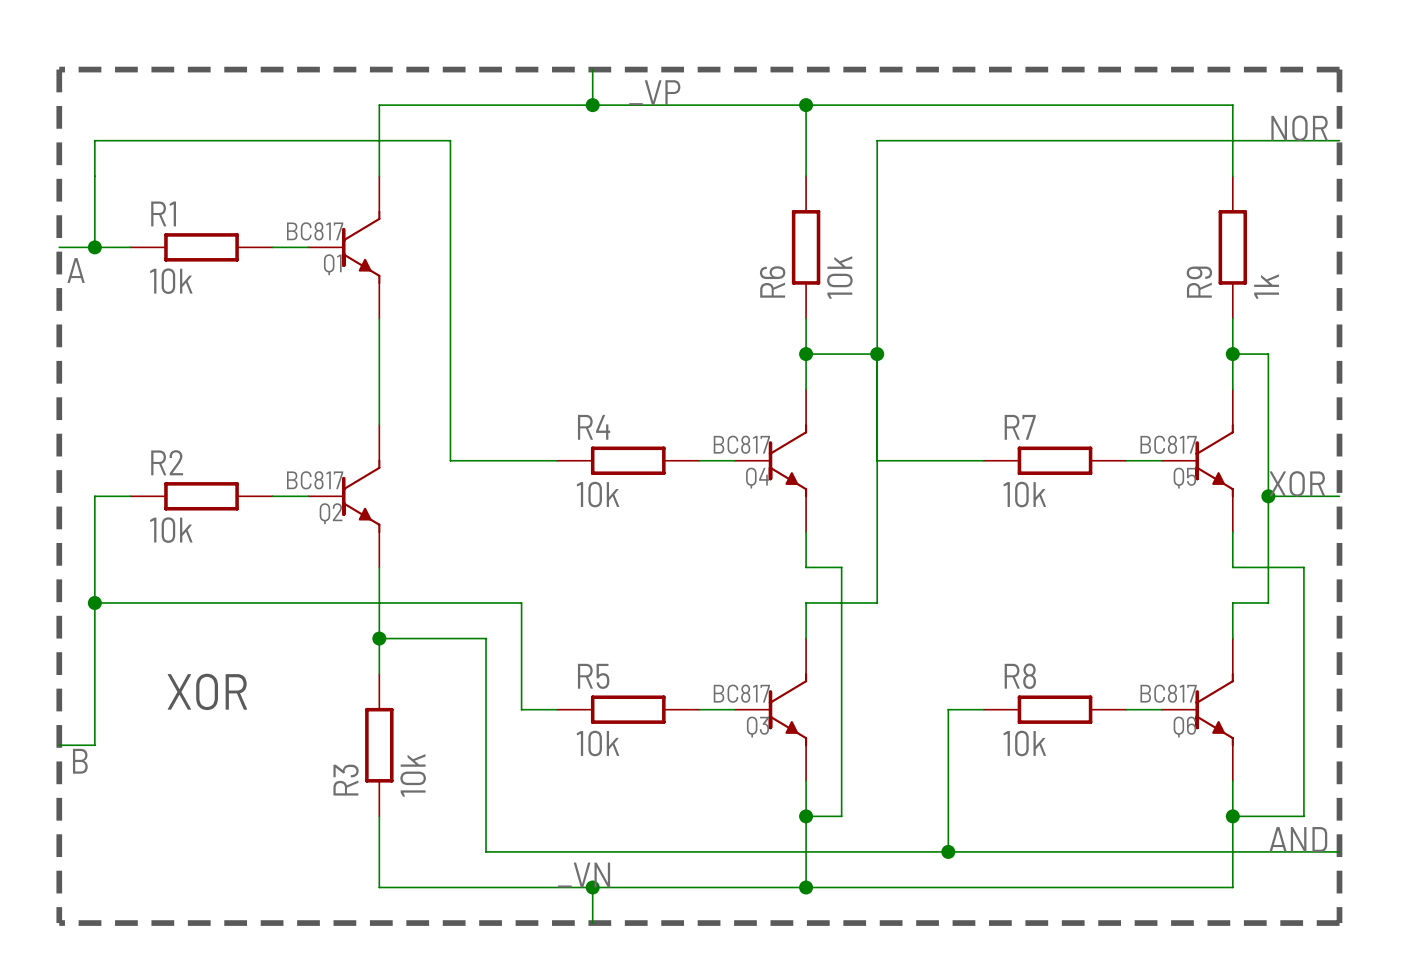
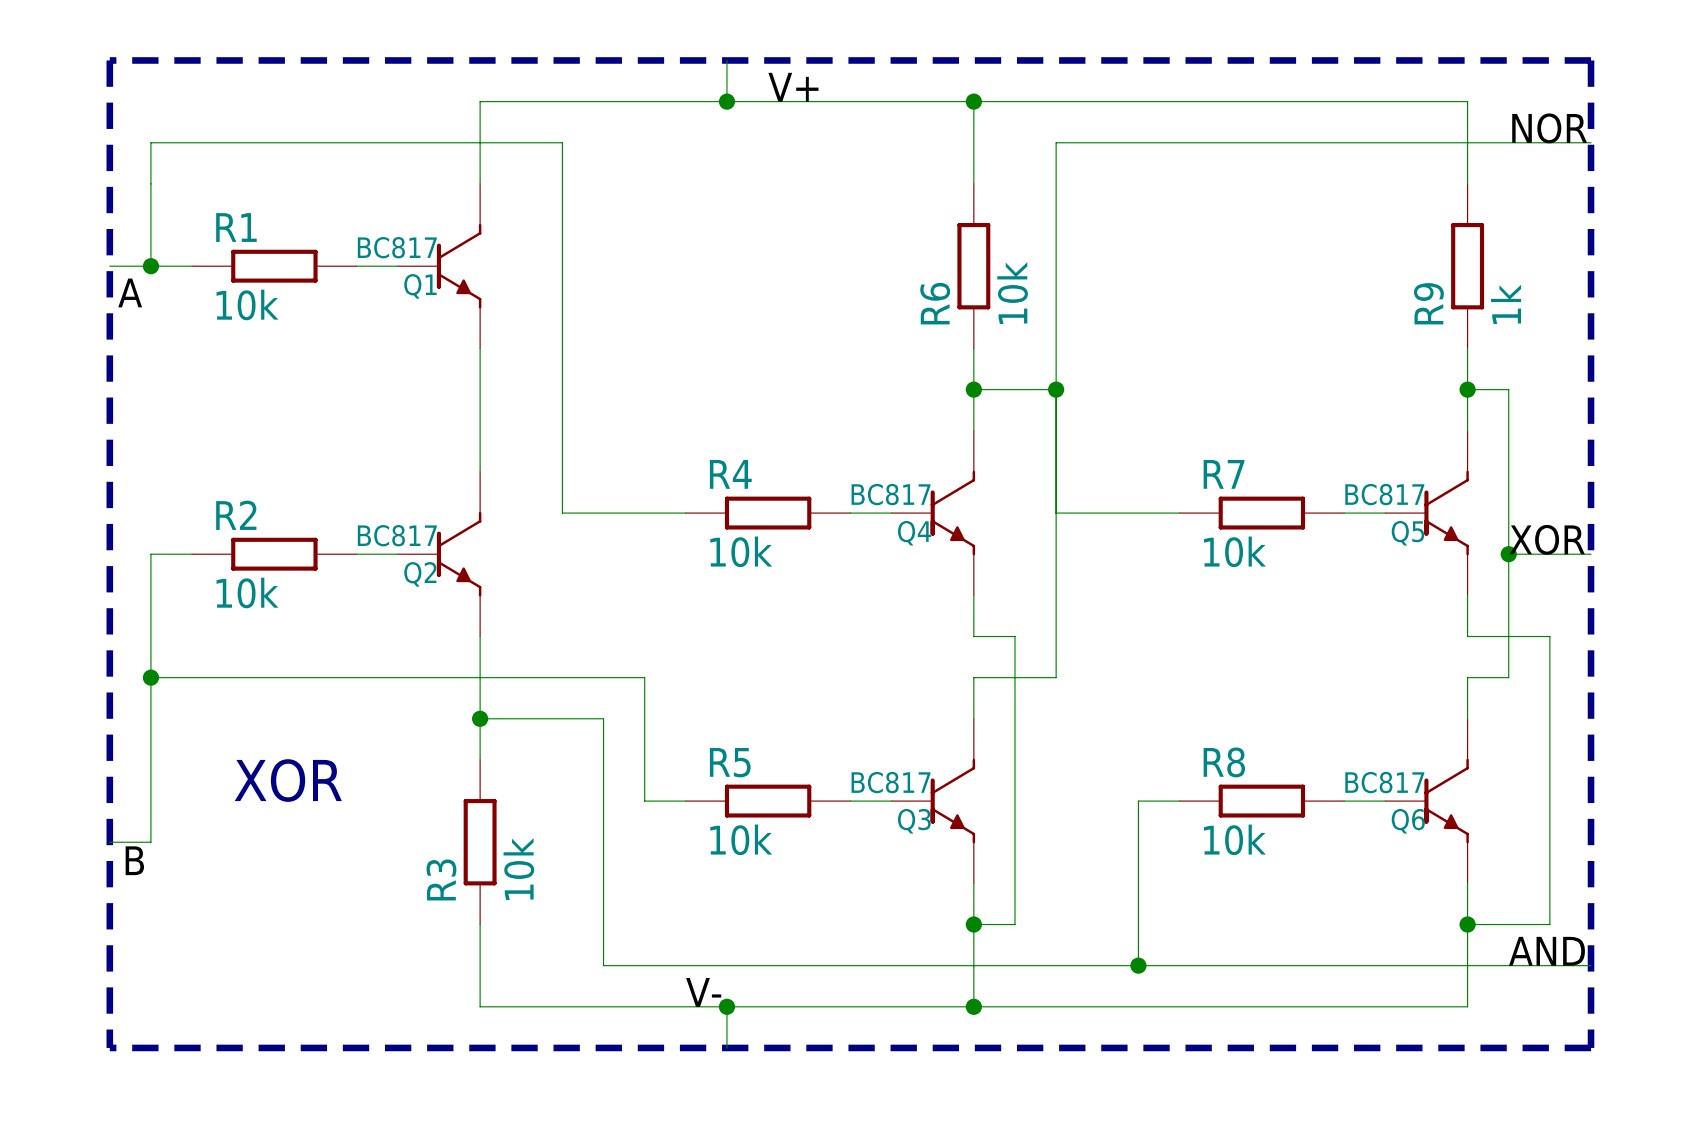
label: _VP (654, 92) -> V+ (793, 87)
label: _VN (584, 875) -> V- (703, 992)

